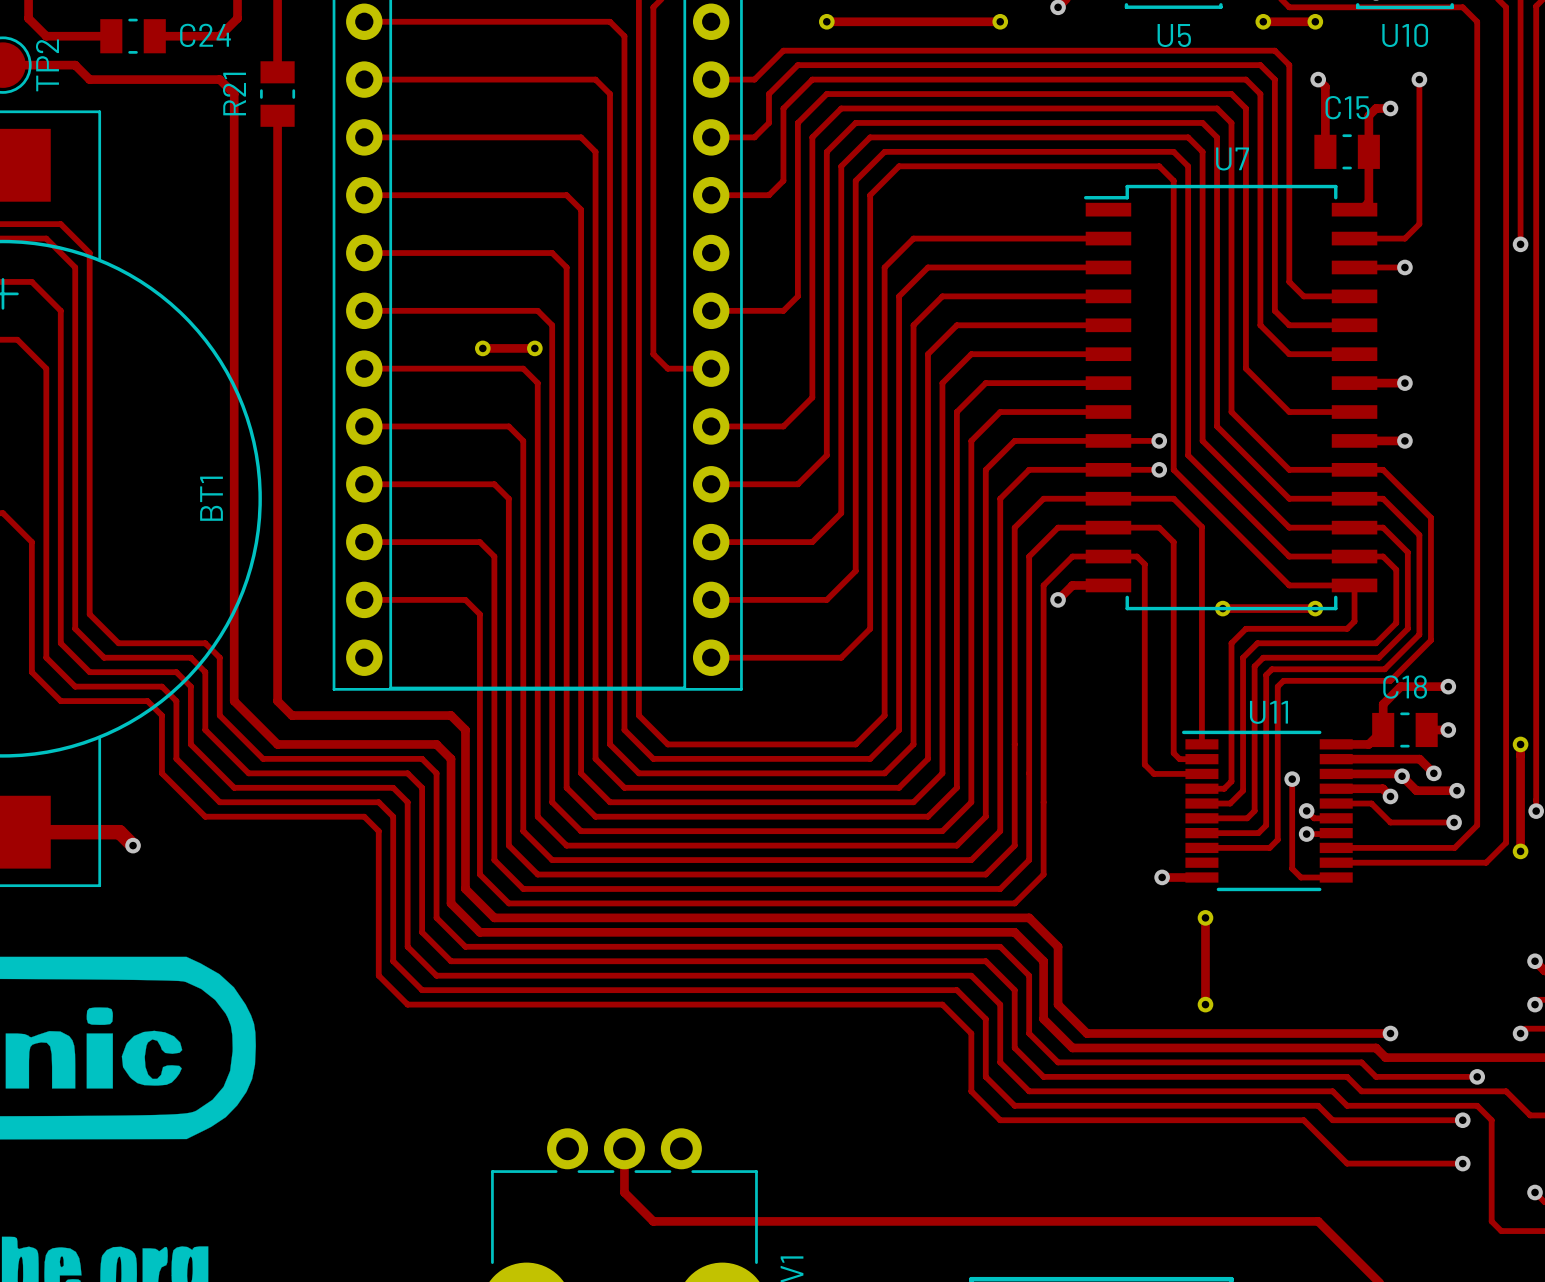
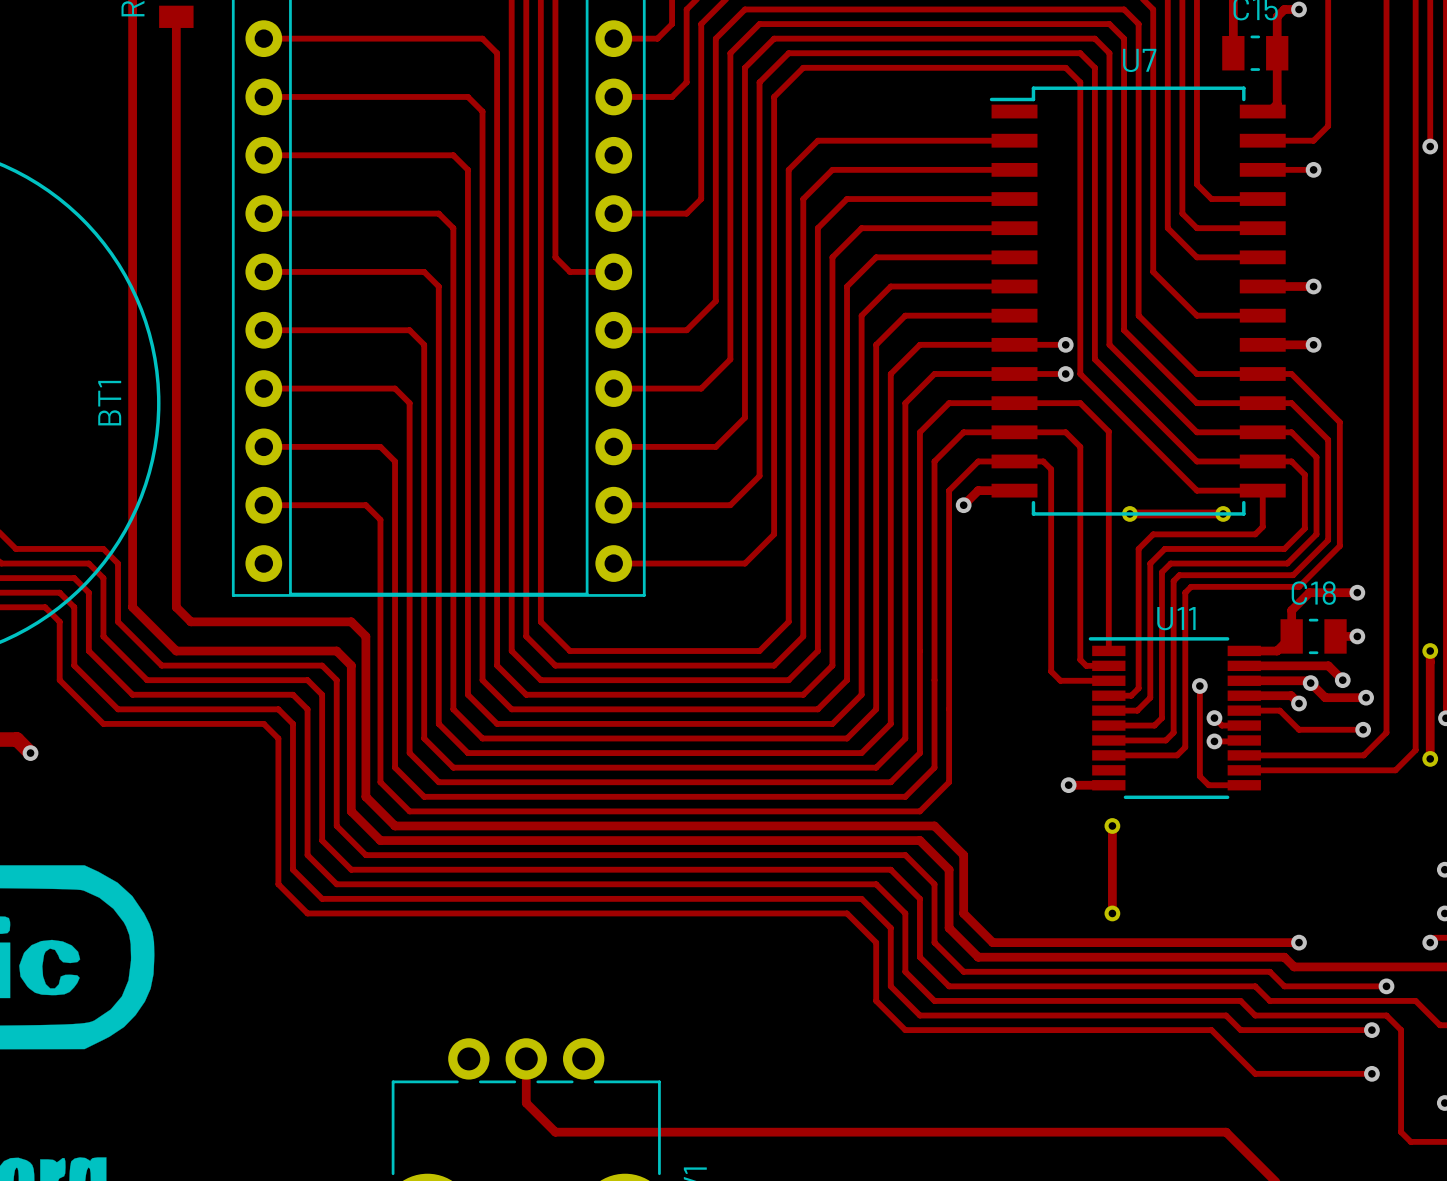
track: (482, 348) (534, 348) -> none
part: (482, 348) -> none
part: (534, 348) -> none

